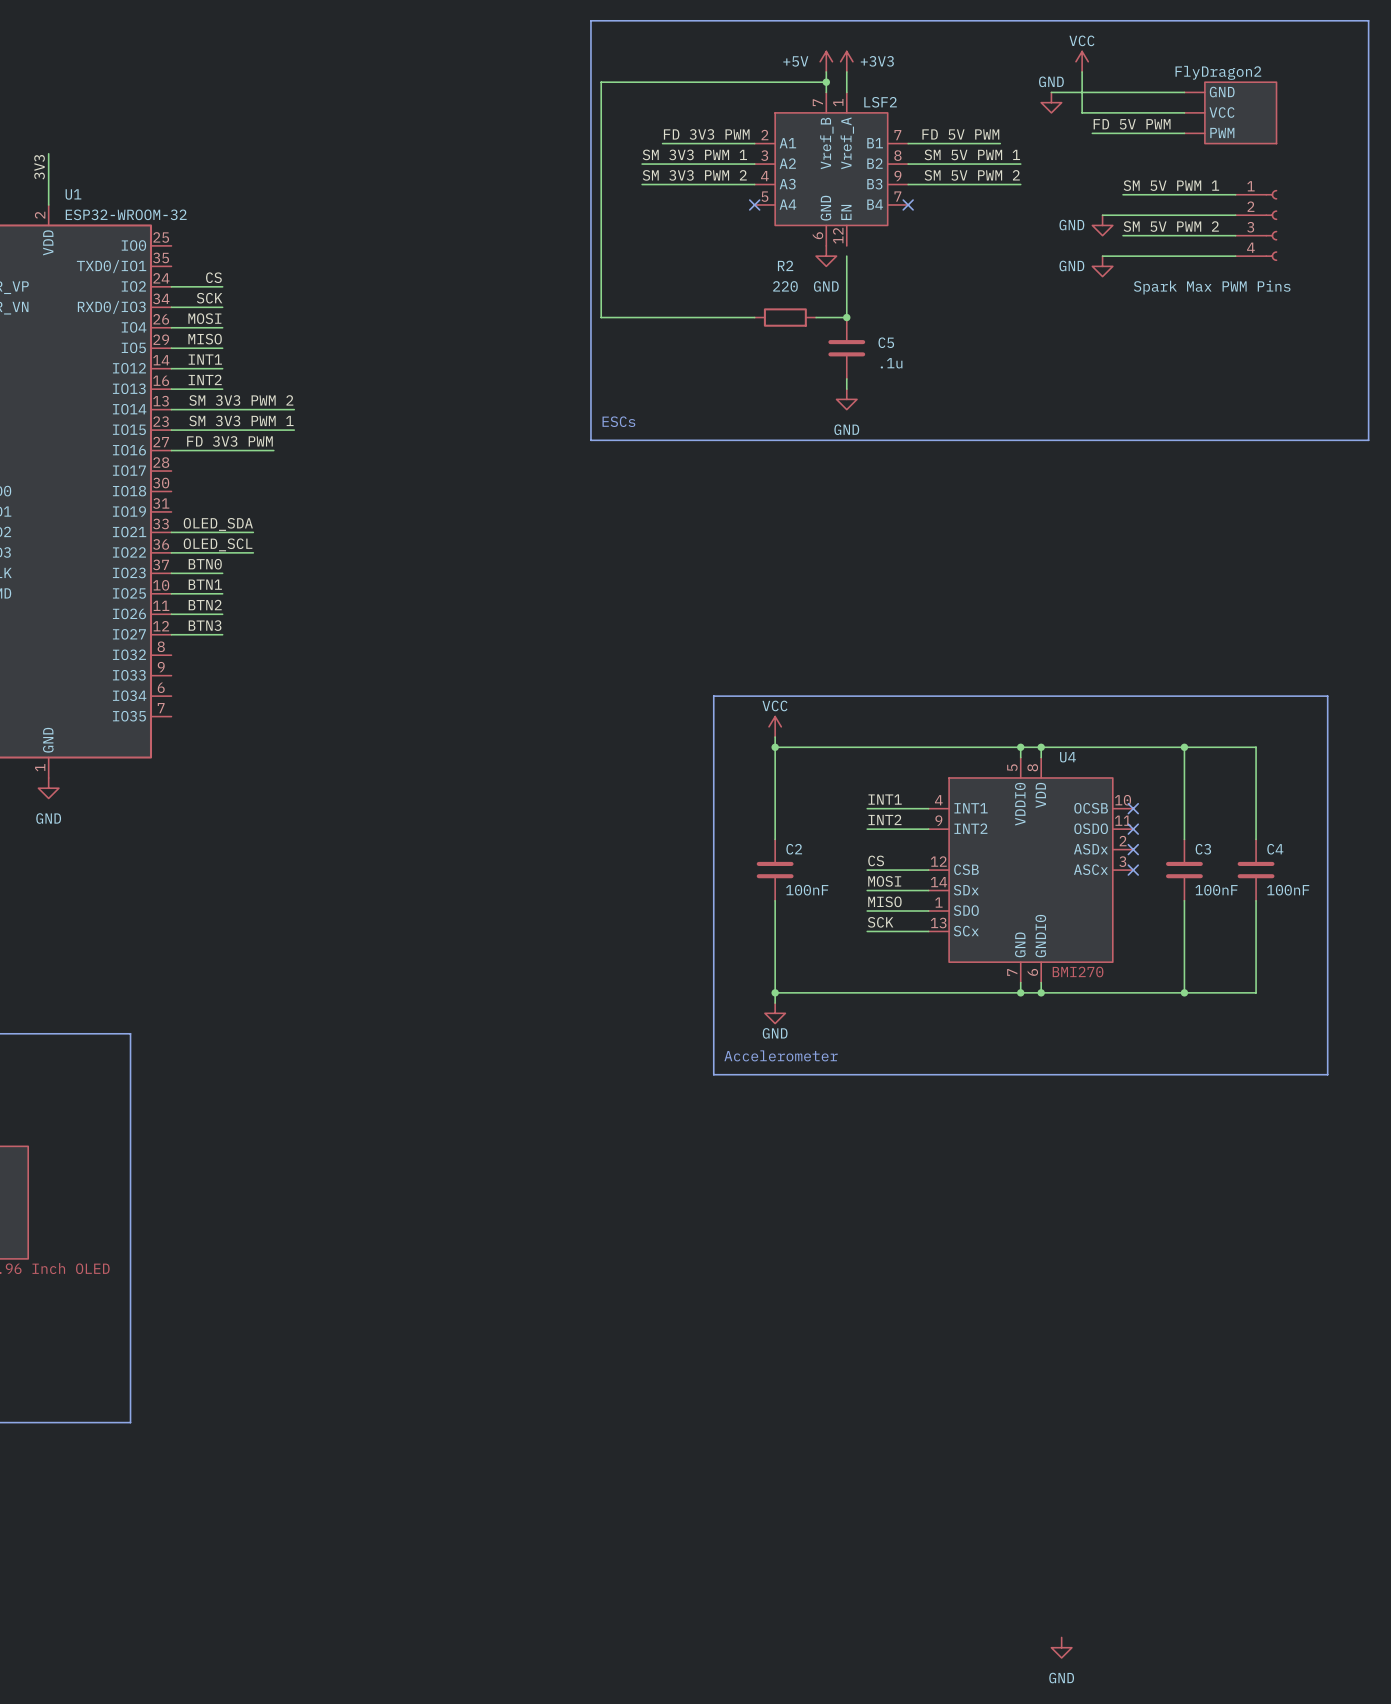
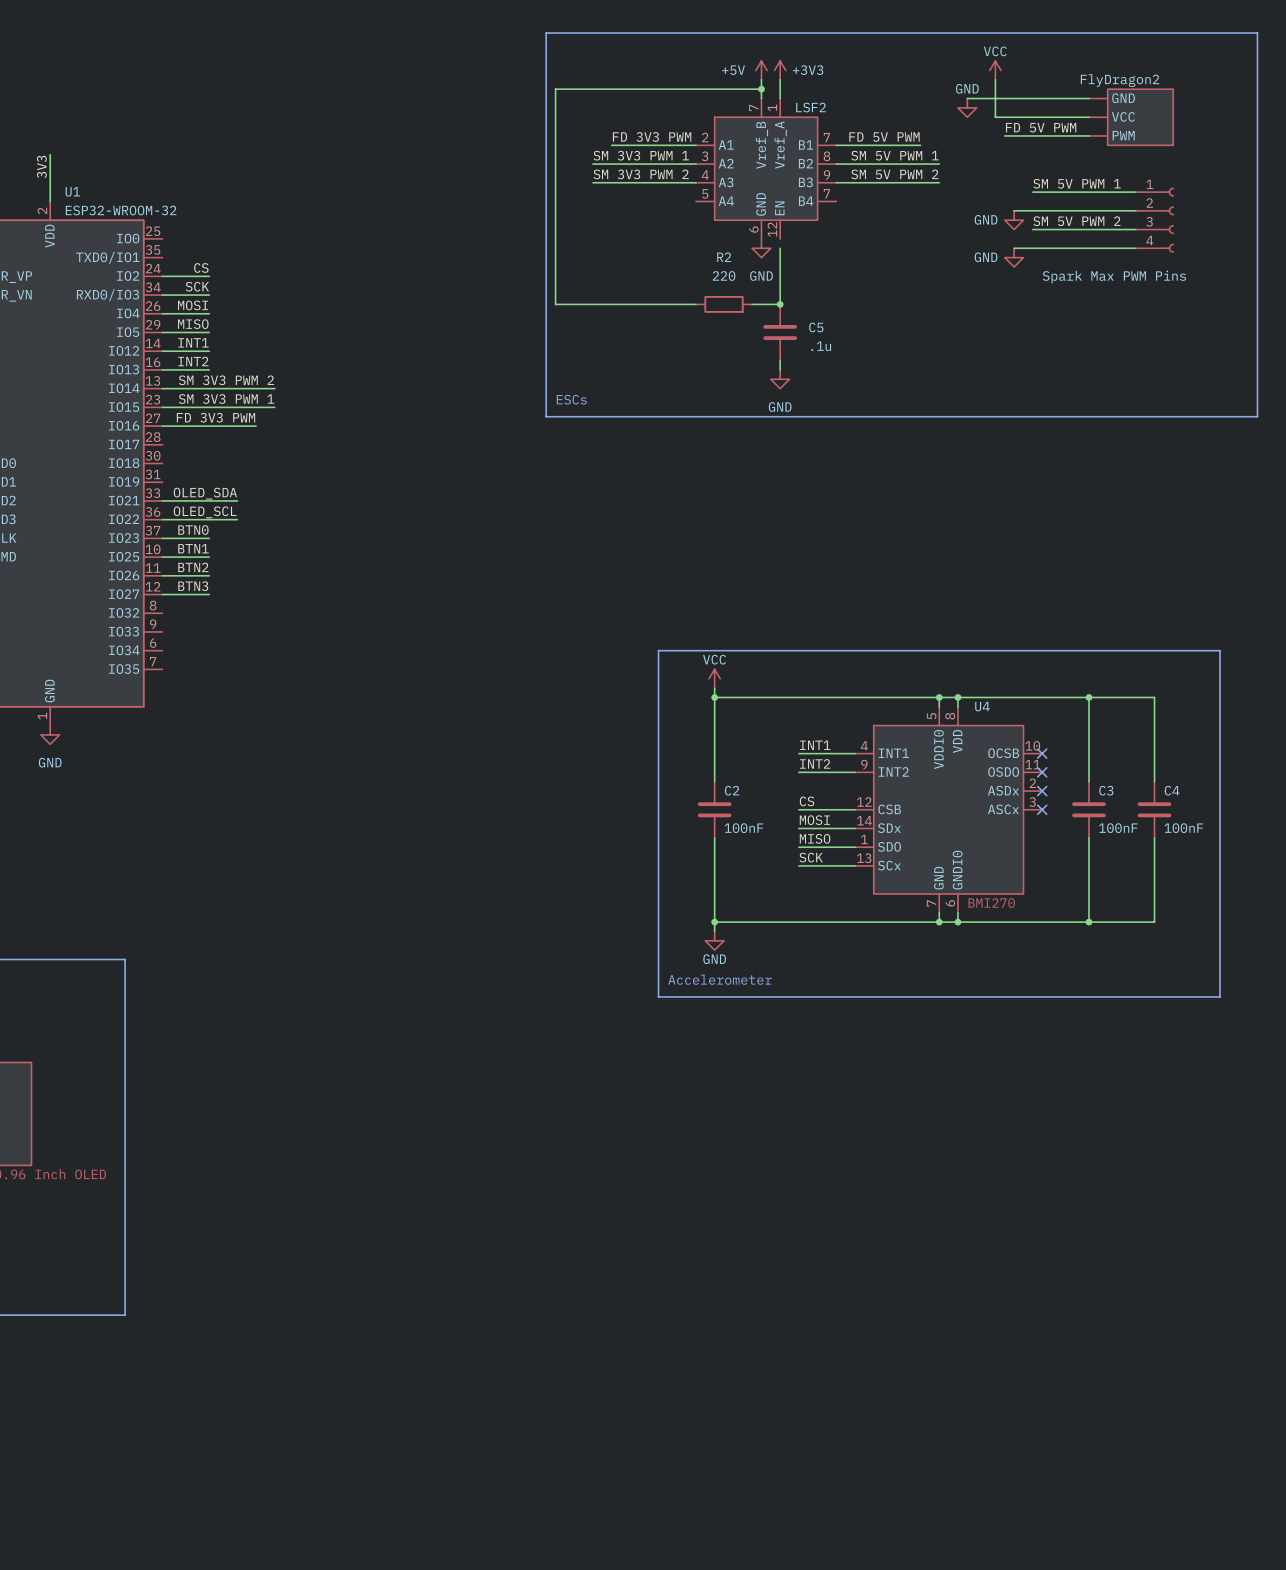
no-connect mark: (754, 204) -> none
no-connect mark: (908, 204) -> none
power symbol: GND (1061, 1647) -> none

